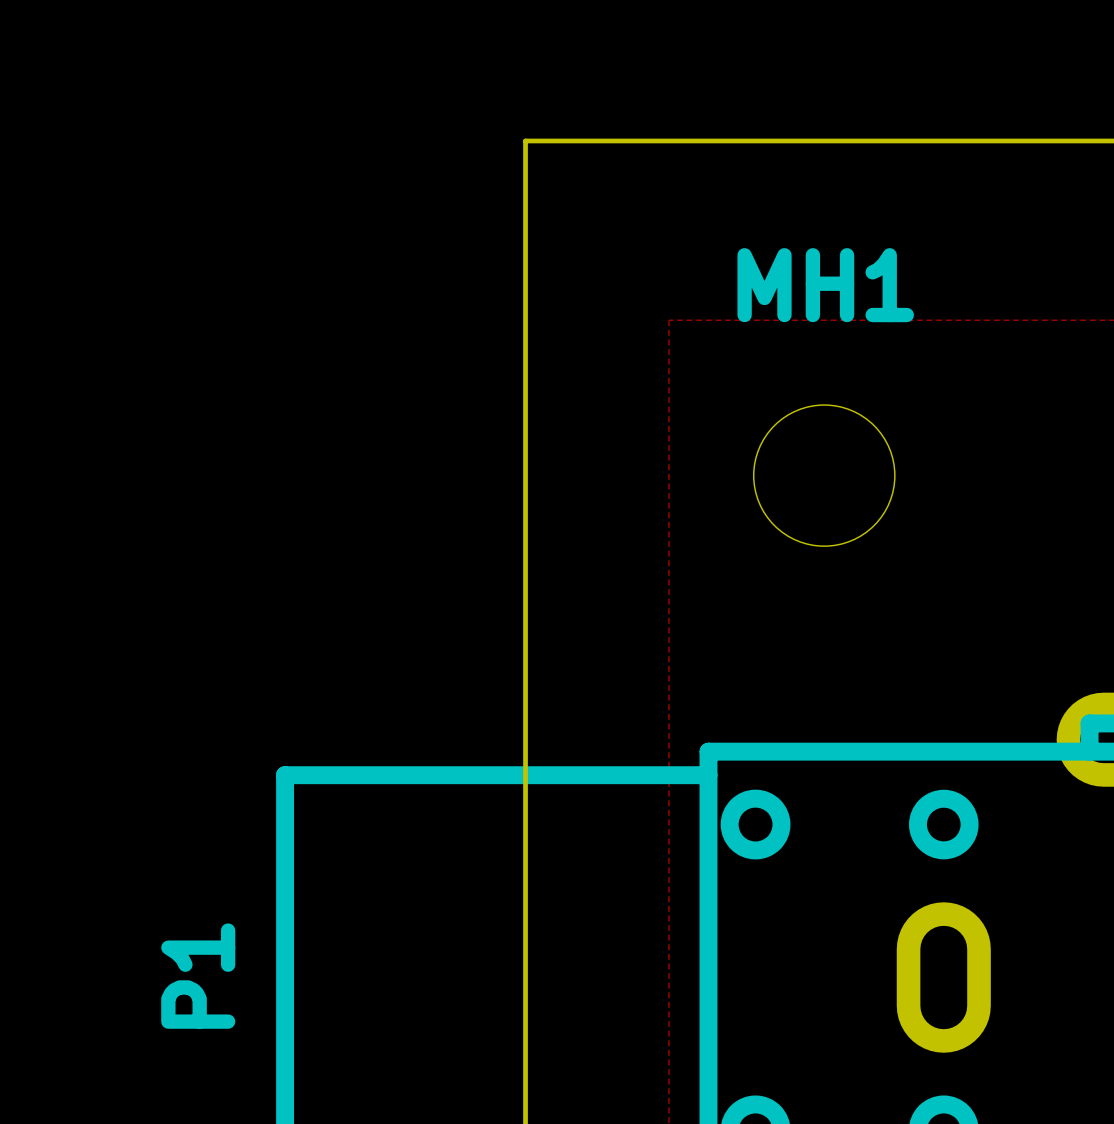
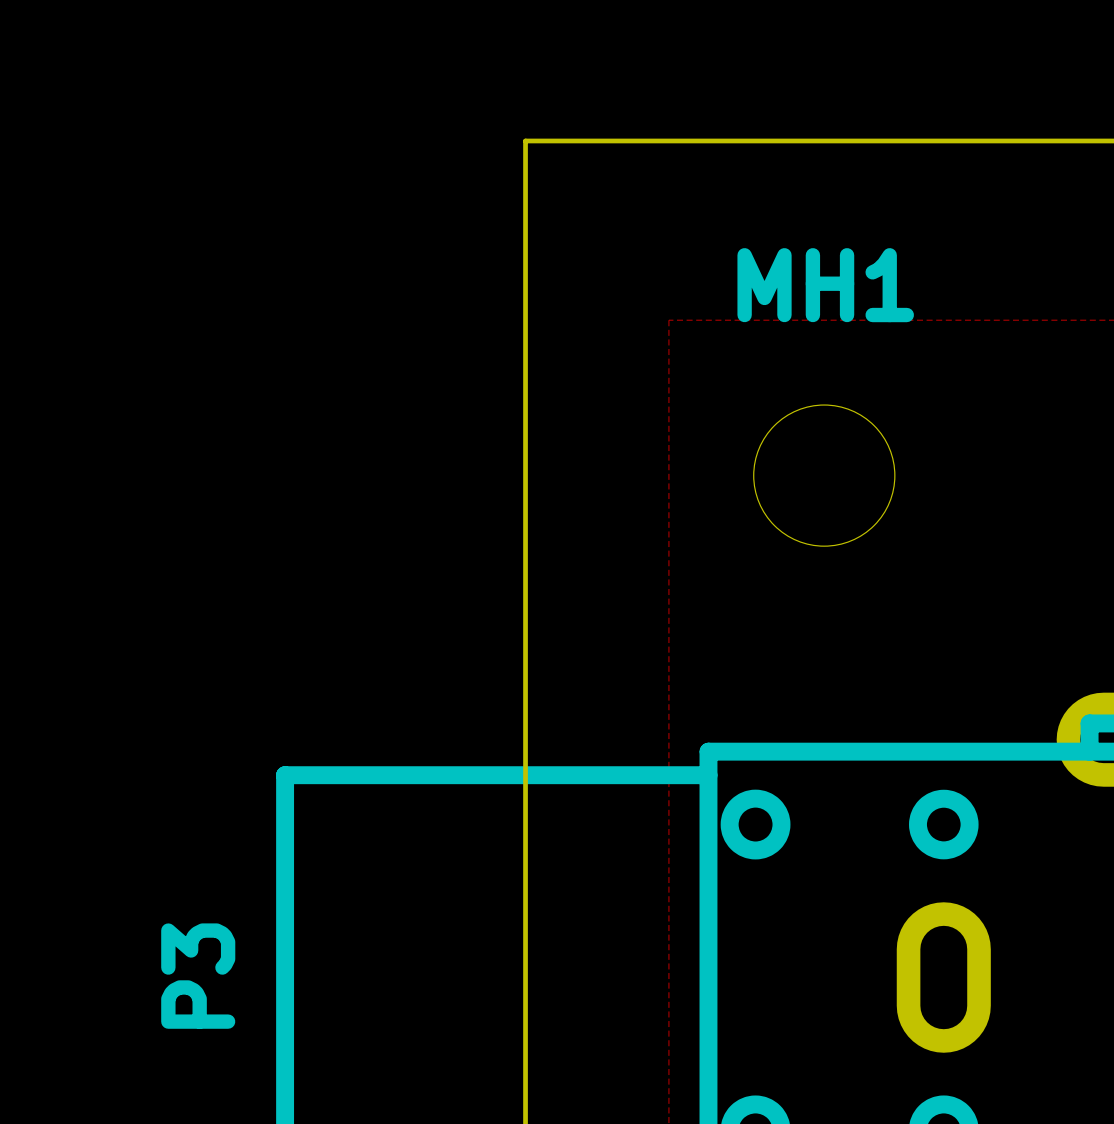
P1 name: P1 (198, 976) -> P3 (198, 976)

